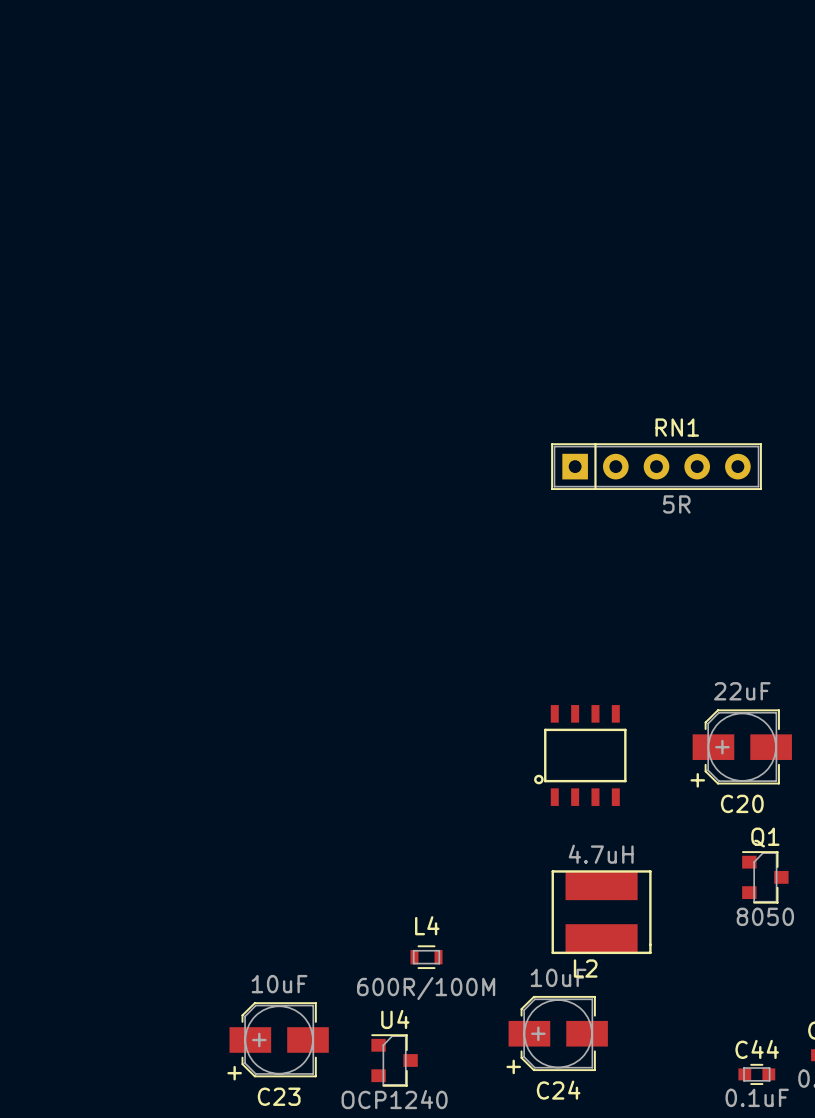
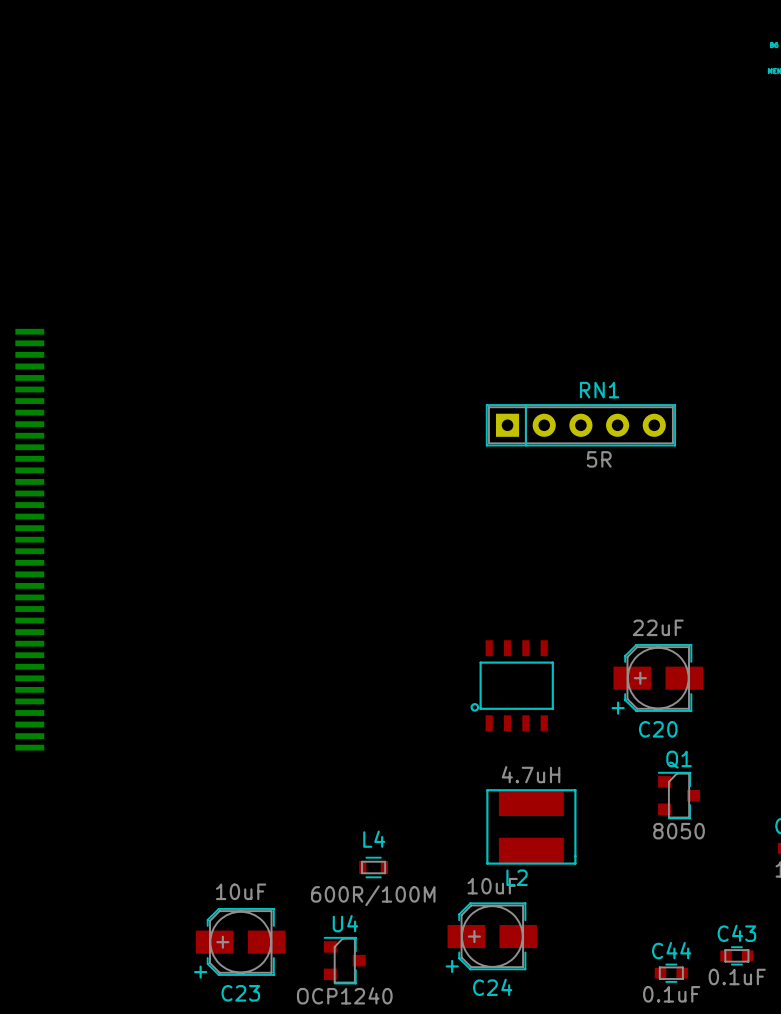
part: none -> (29, 539)

